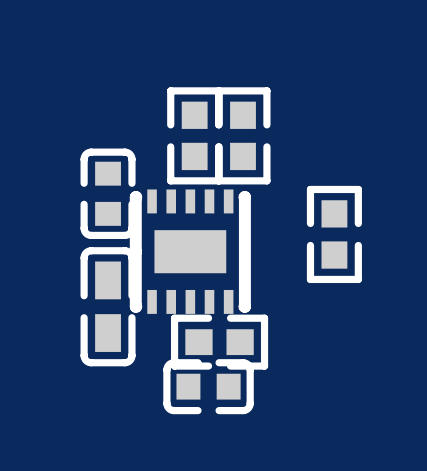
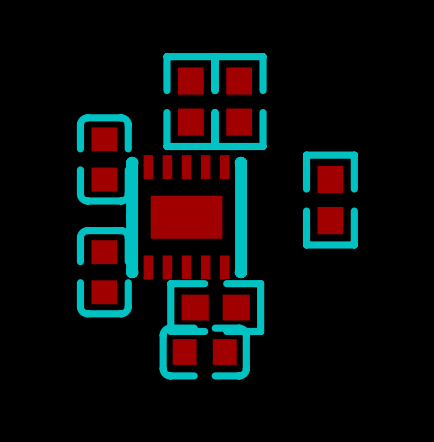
part footprint: [80, 247, 136, 367] -> [76, 227, 132, 318]

